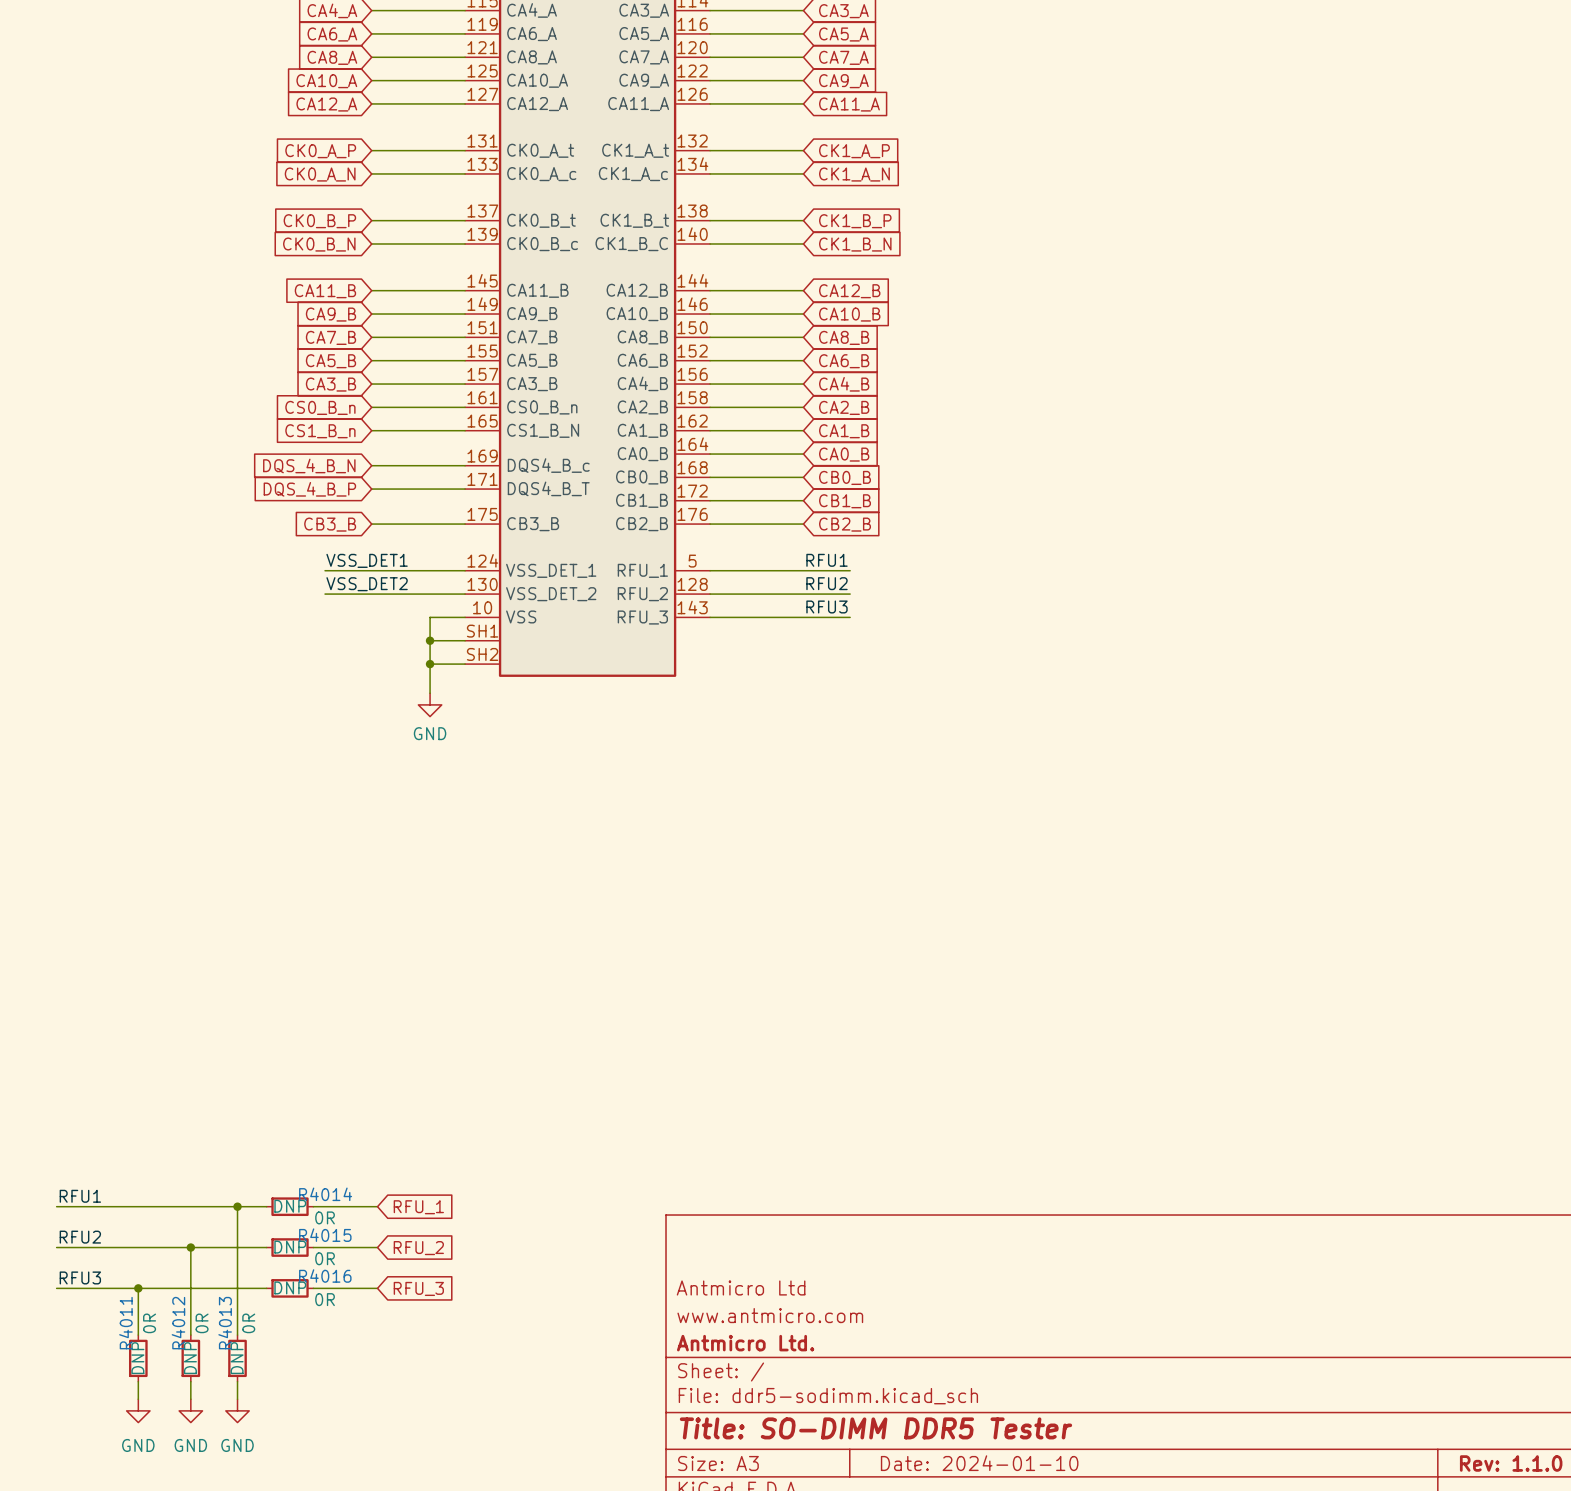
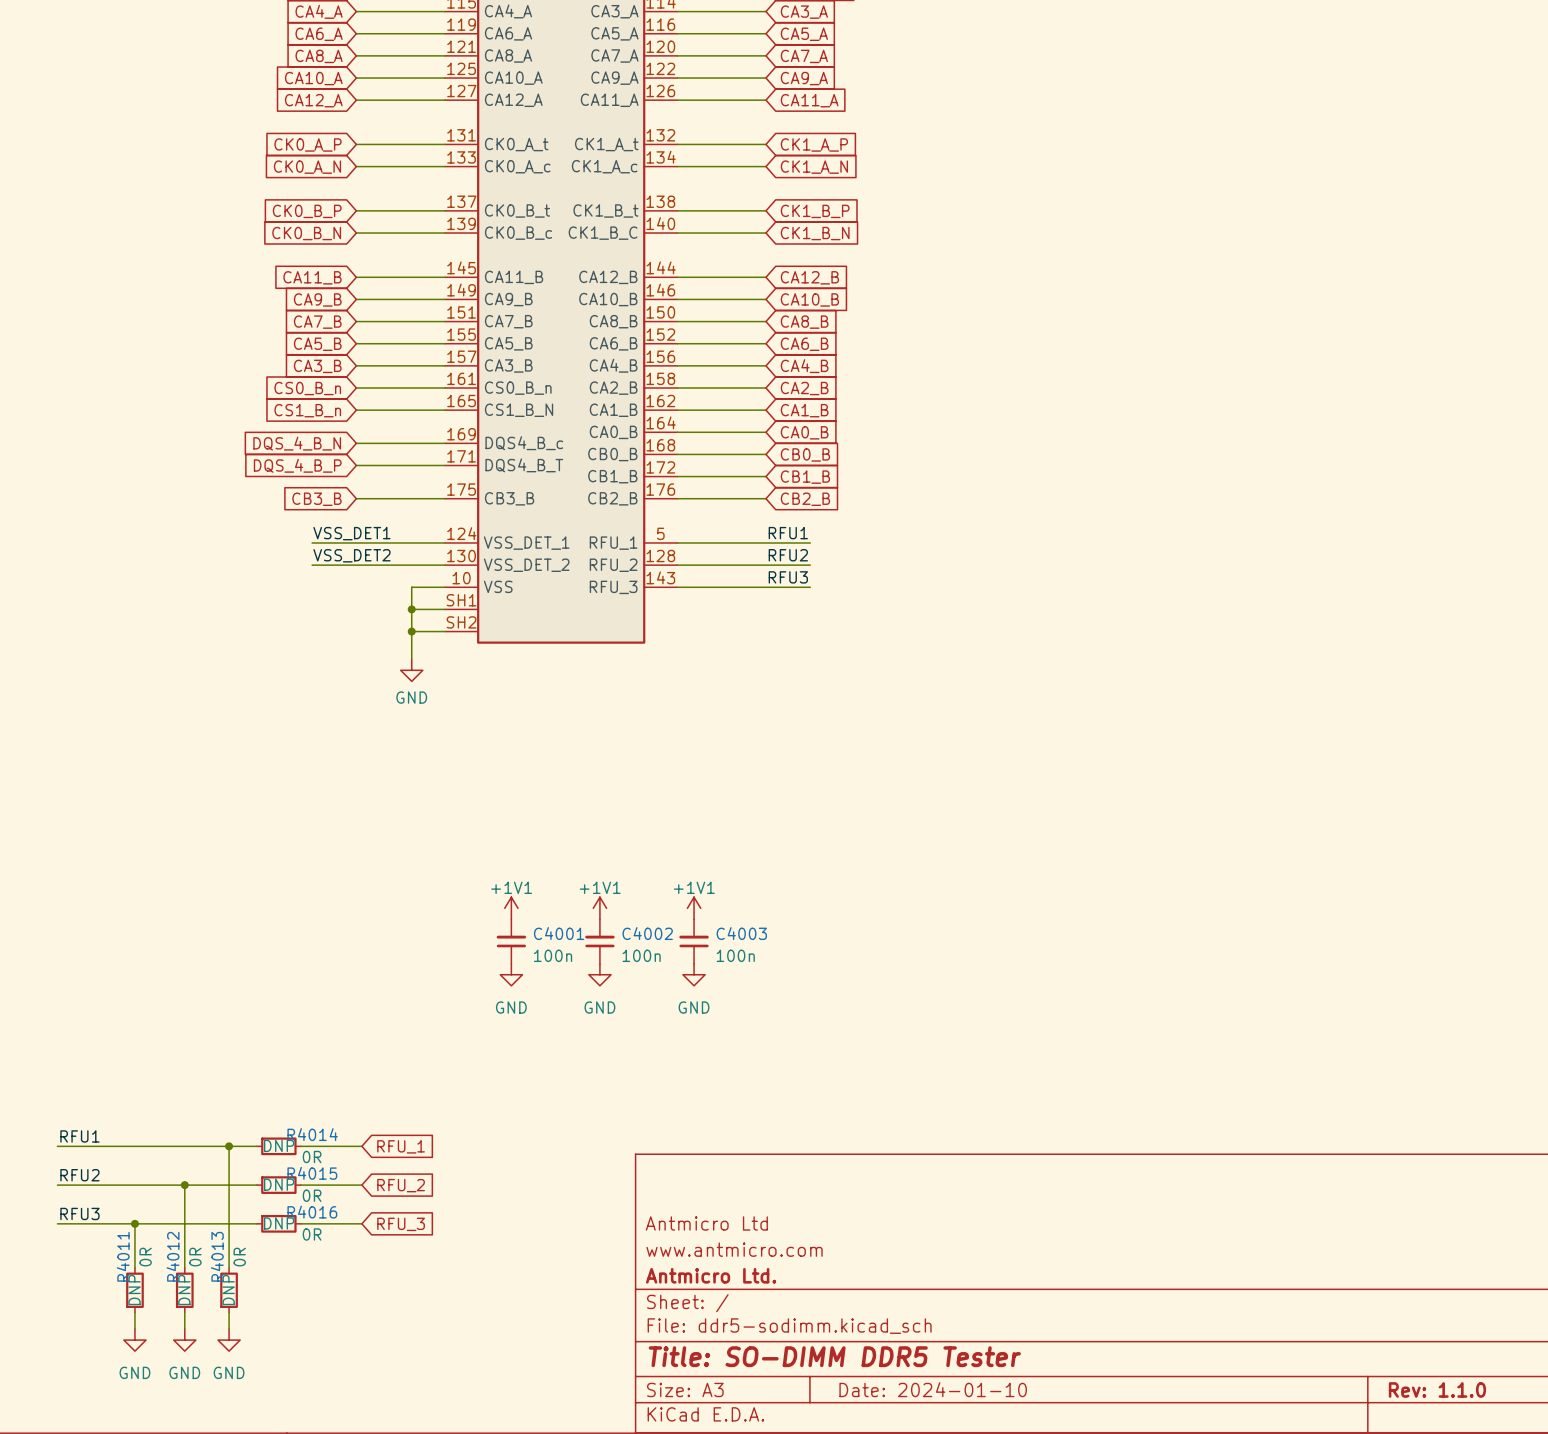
power symbol: none -> +1V1 (511, 908)
power symbol: none -> +1V1 (599, 908)
power symbol: none -> +1V1 (694, 908)
C4001: none -> (511, 941)
C4002: none -> (599, 941)
C4003: none -> (694, 941)
power symbol: none -> GND (511, 974)
power symbol: none -> GND (599, 974)
power symbol: none -> GND (694, 974)

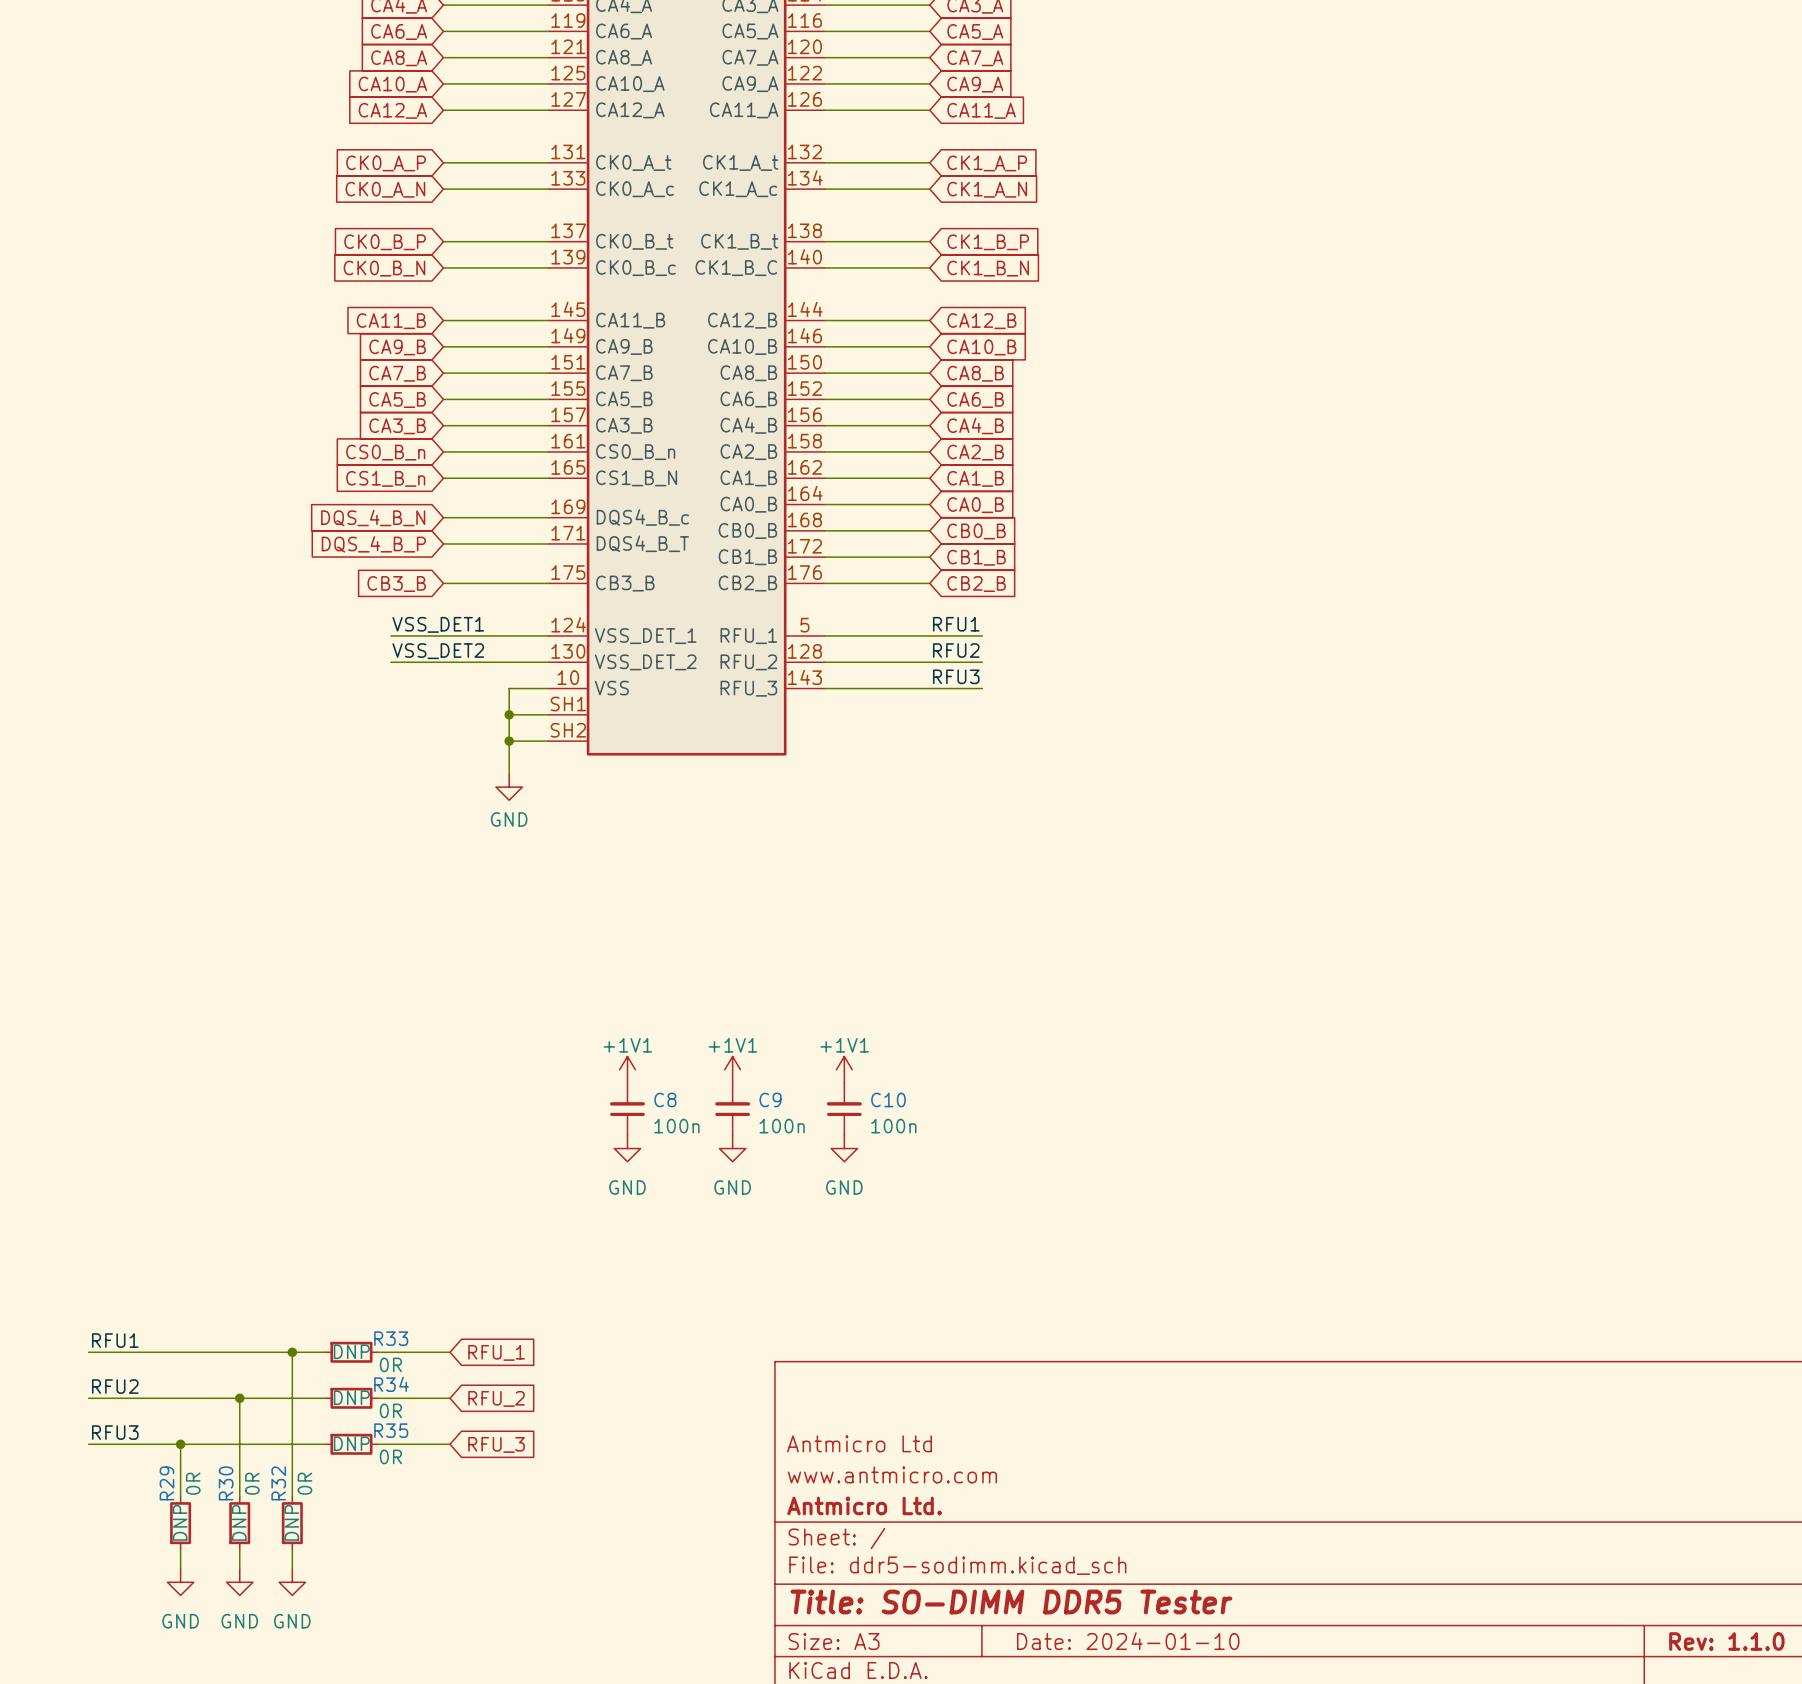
C4001 name: C4001 (559, 933) -> C8 (665, 1099)
C4002 name: C4002 (647, 933) -> C9 (770, 1099)
C4003 name: C4003 (741, 933) -> C10 (888, 1099)
R4014 name: R4014 (312, 1134) -> R33 (391, 1338)
R4015 name: R4015 (312, 1173) -> R34 (391, 1384)
R4016 name: R4016 (312, 1212) -> R35 (391, 1430)
R4011 name: R4011 (123, 1256) -> R29 (166, 1483)
R4012 name: R4012 (173, 1256) -> R30 (226, 1483)
R4013 name: R4013 (217, 1256) -> R32 (278, 1483)

